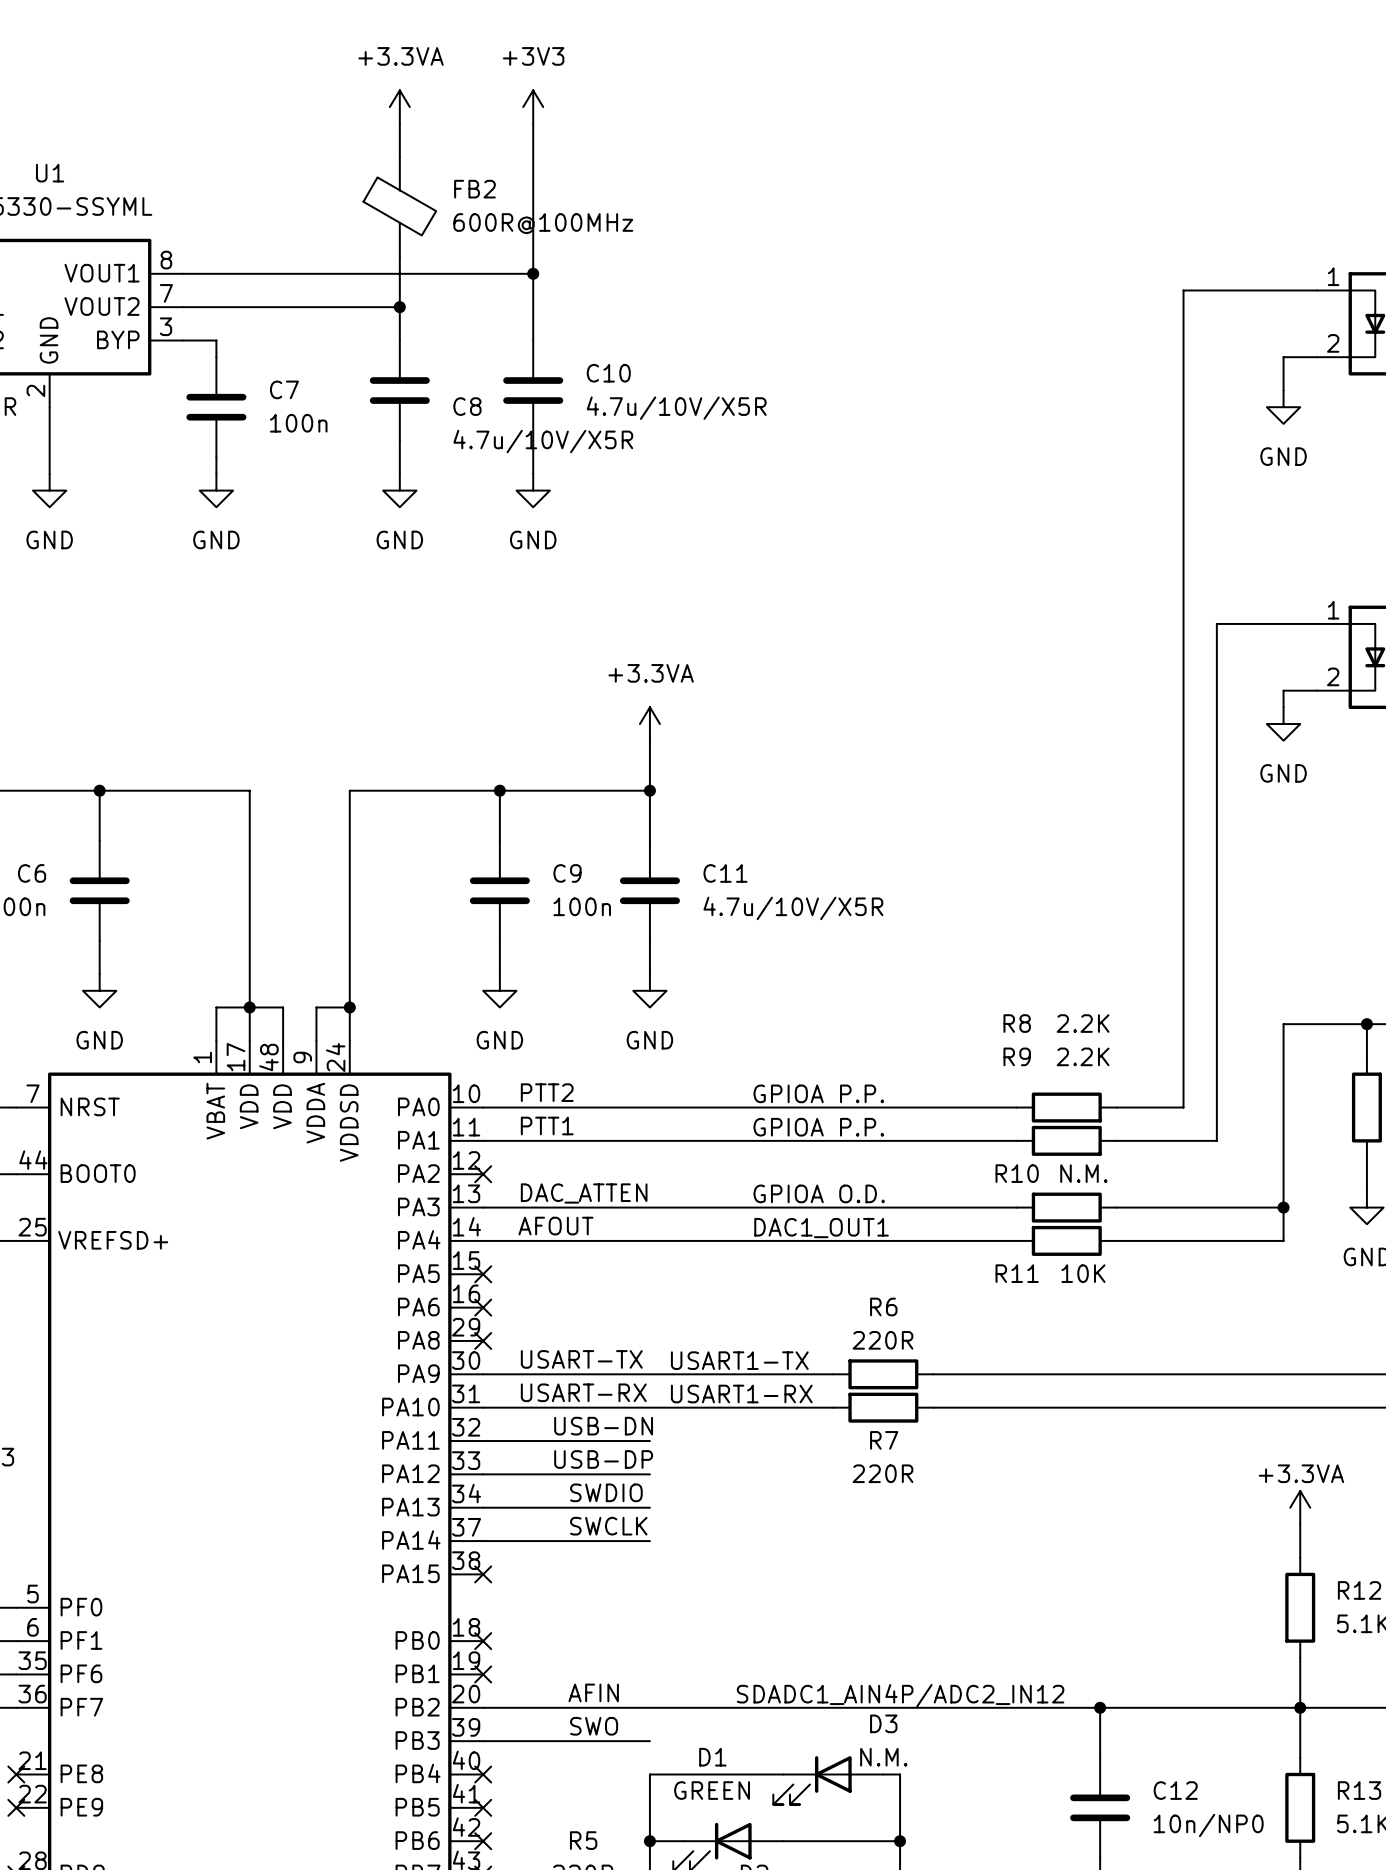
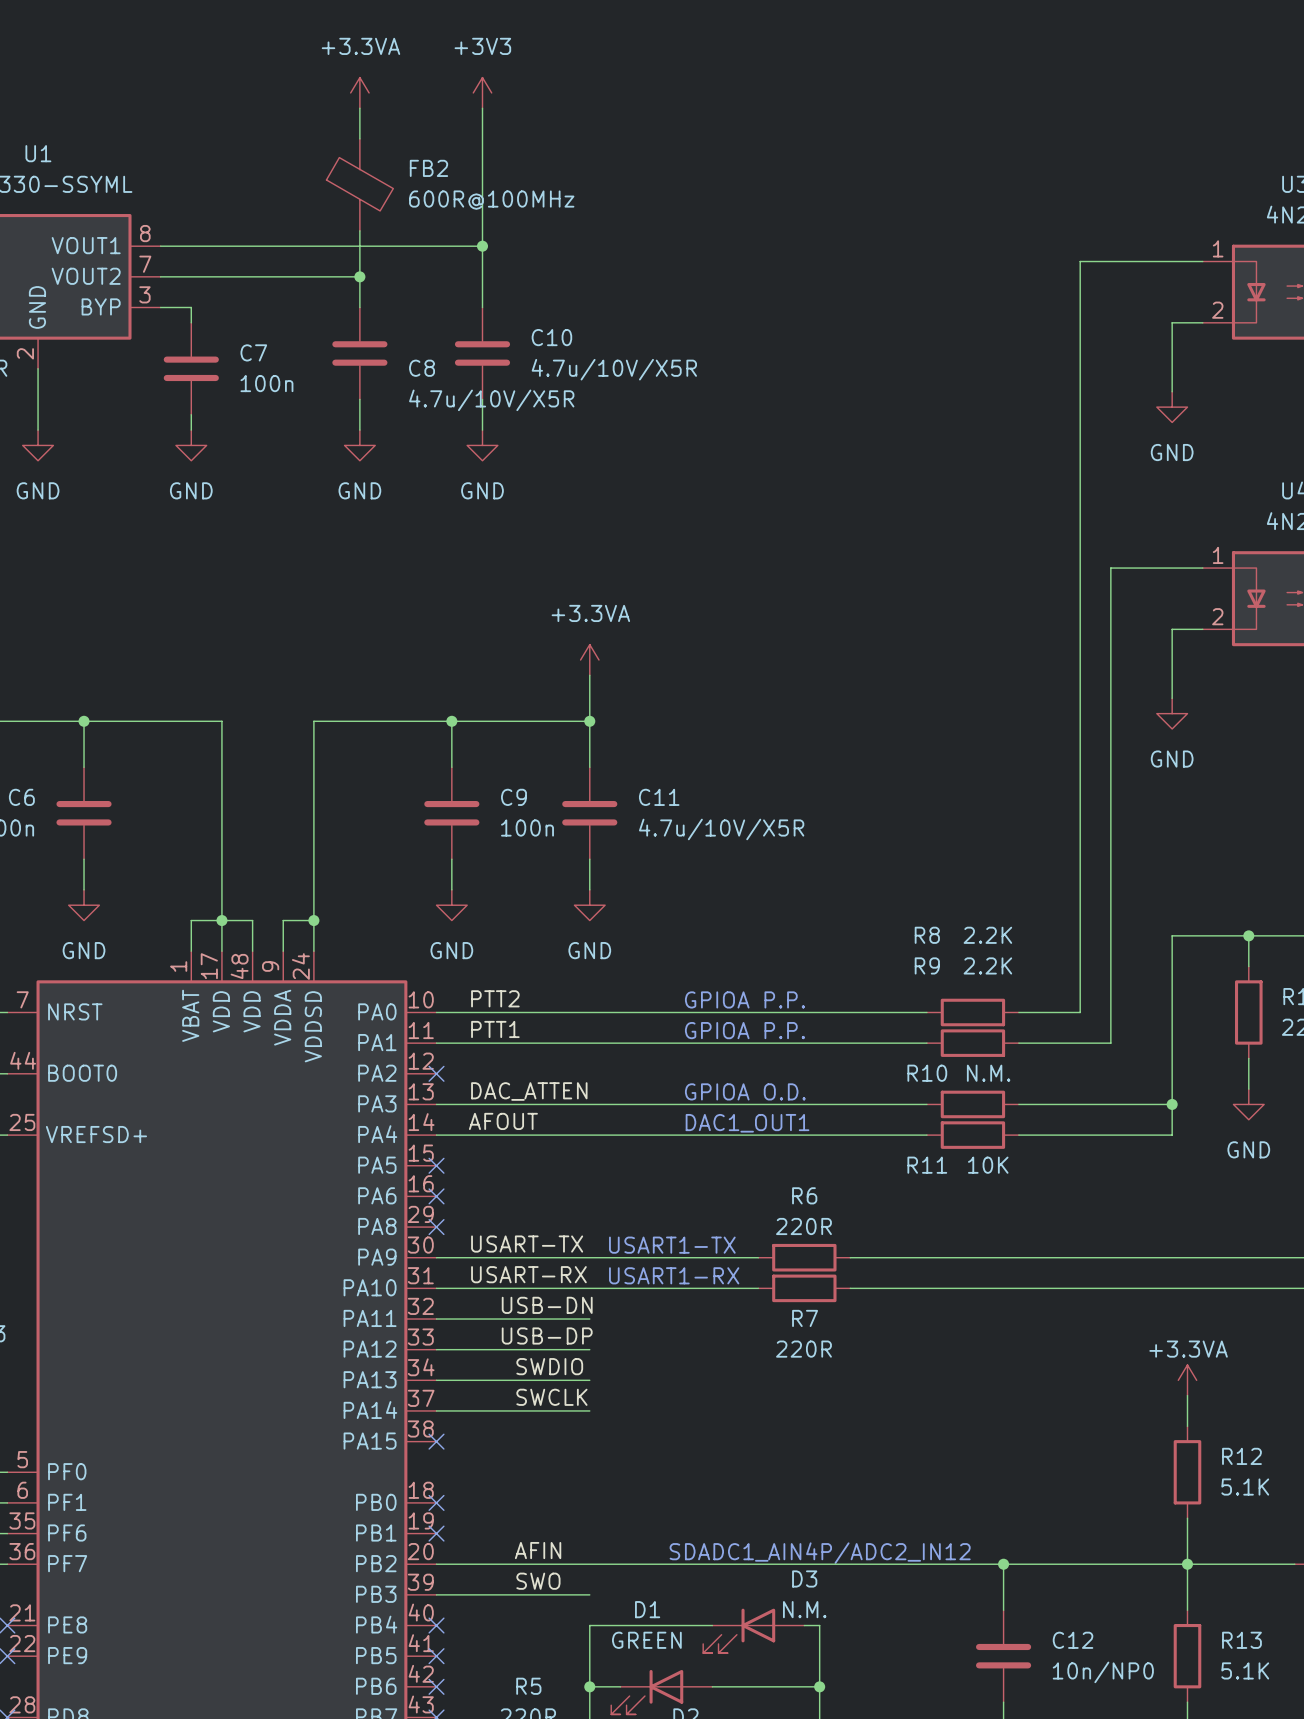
wire: none -> (1172, 353) (1172, 391)
power symbol position: GND (1283, 407) -> GND (1172, 407)
wire: none -> (1172, 644) (1172, 698)
power symbol position: GND (1283, 724) -> GND (1172, 713)

